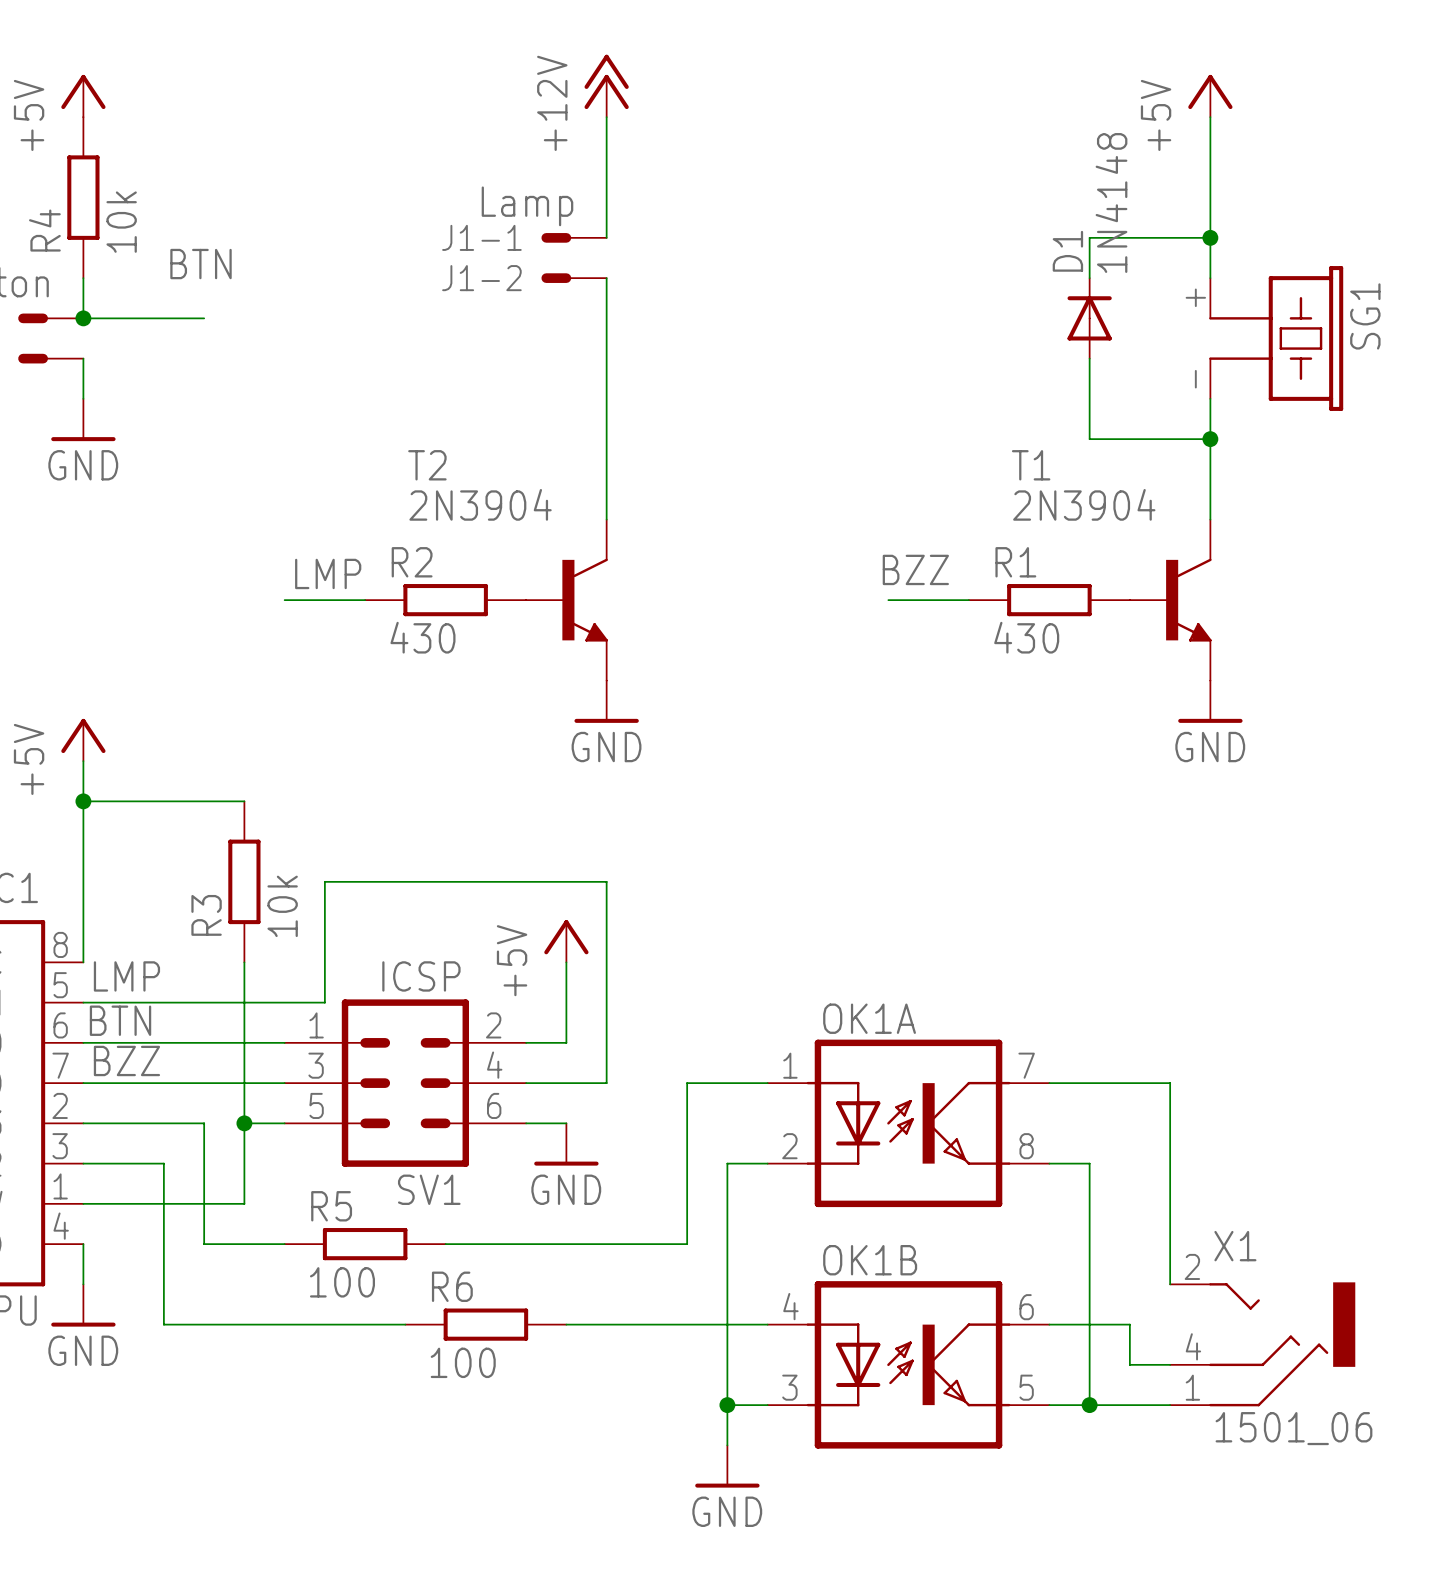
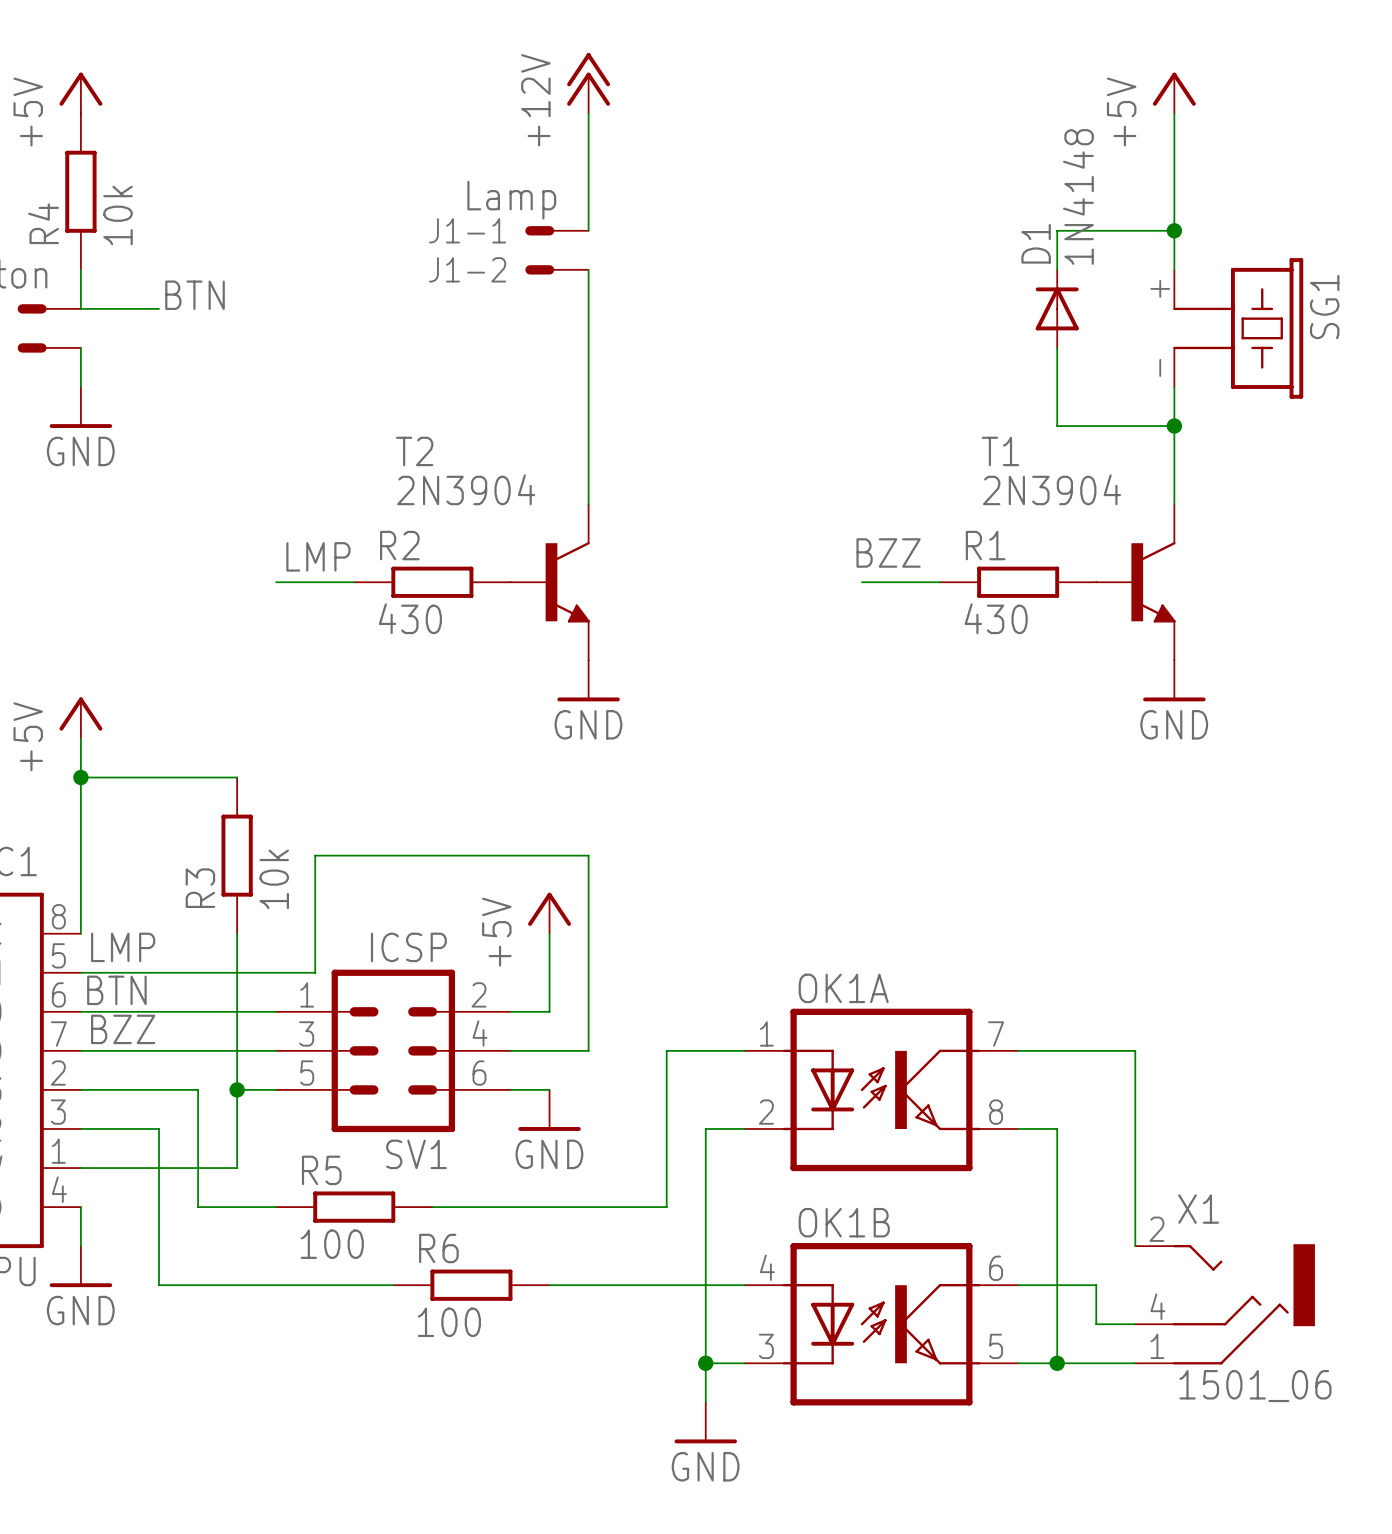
label position: BTN (201, 264) -> BTN (195, 295)
junction: (83, 318) -> none
wire: (163, 318) (204, 318) -> none

